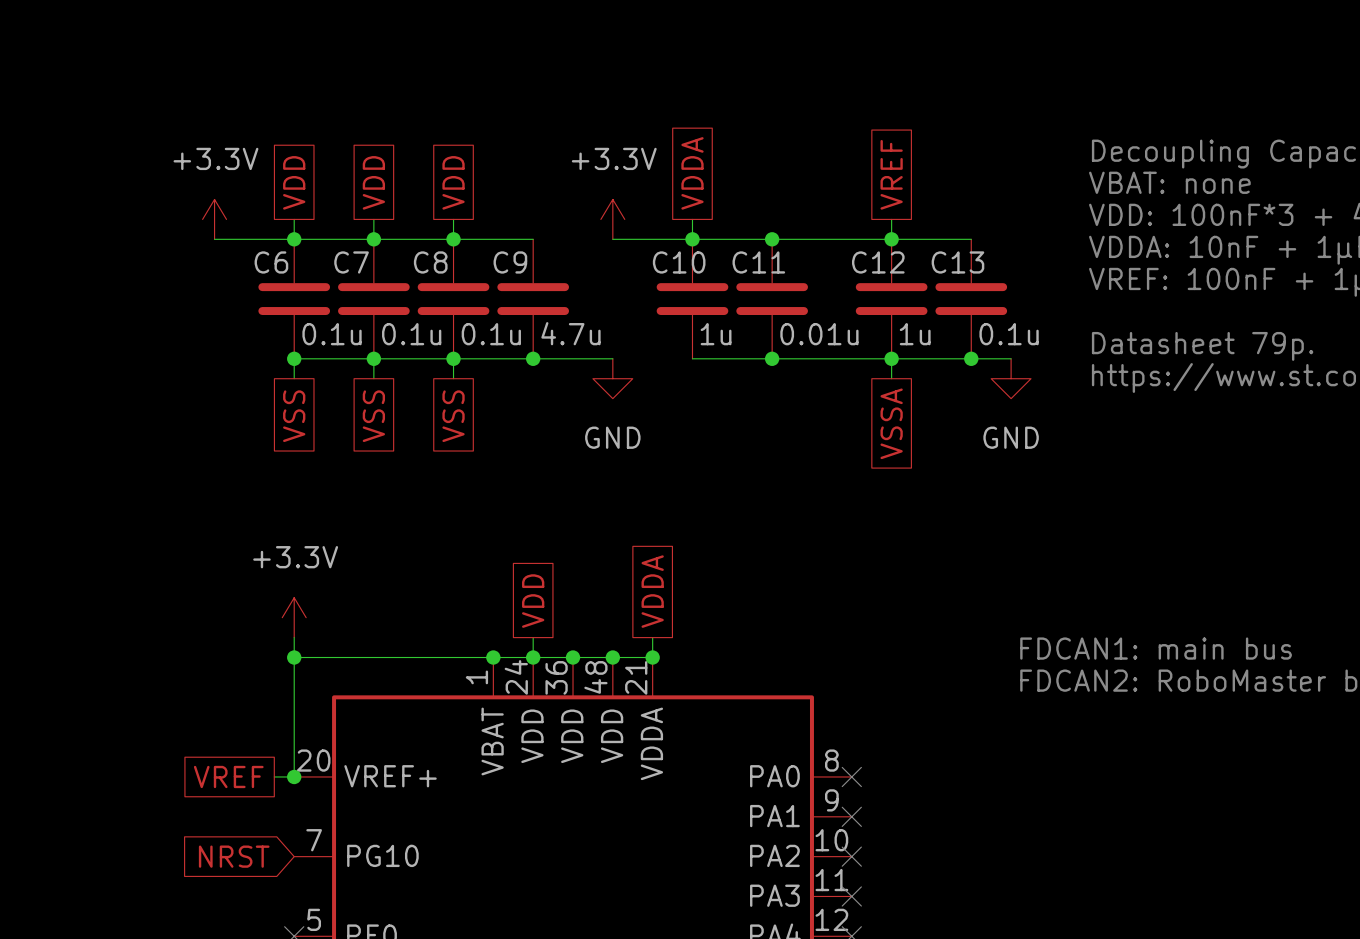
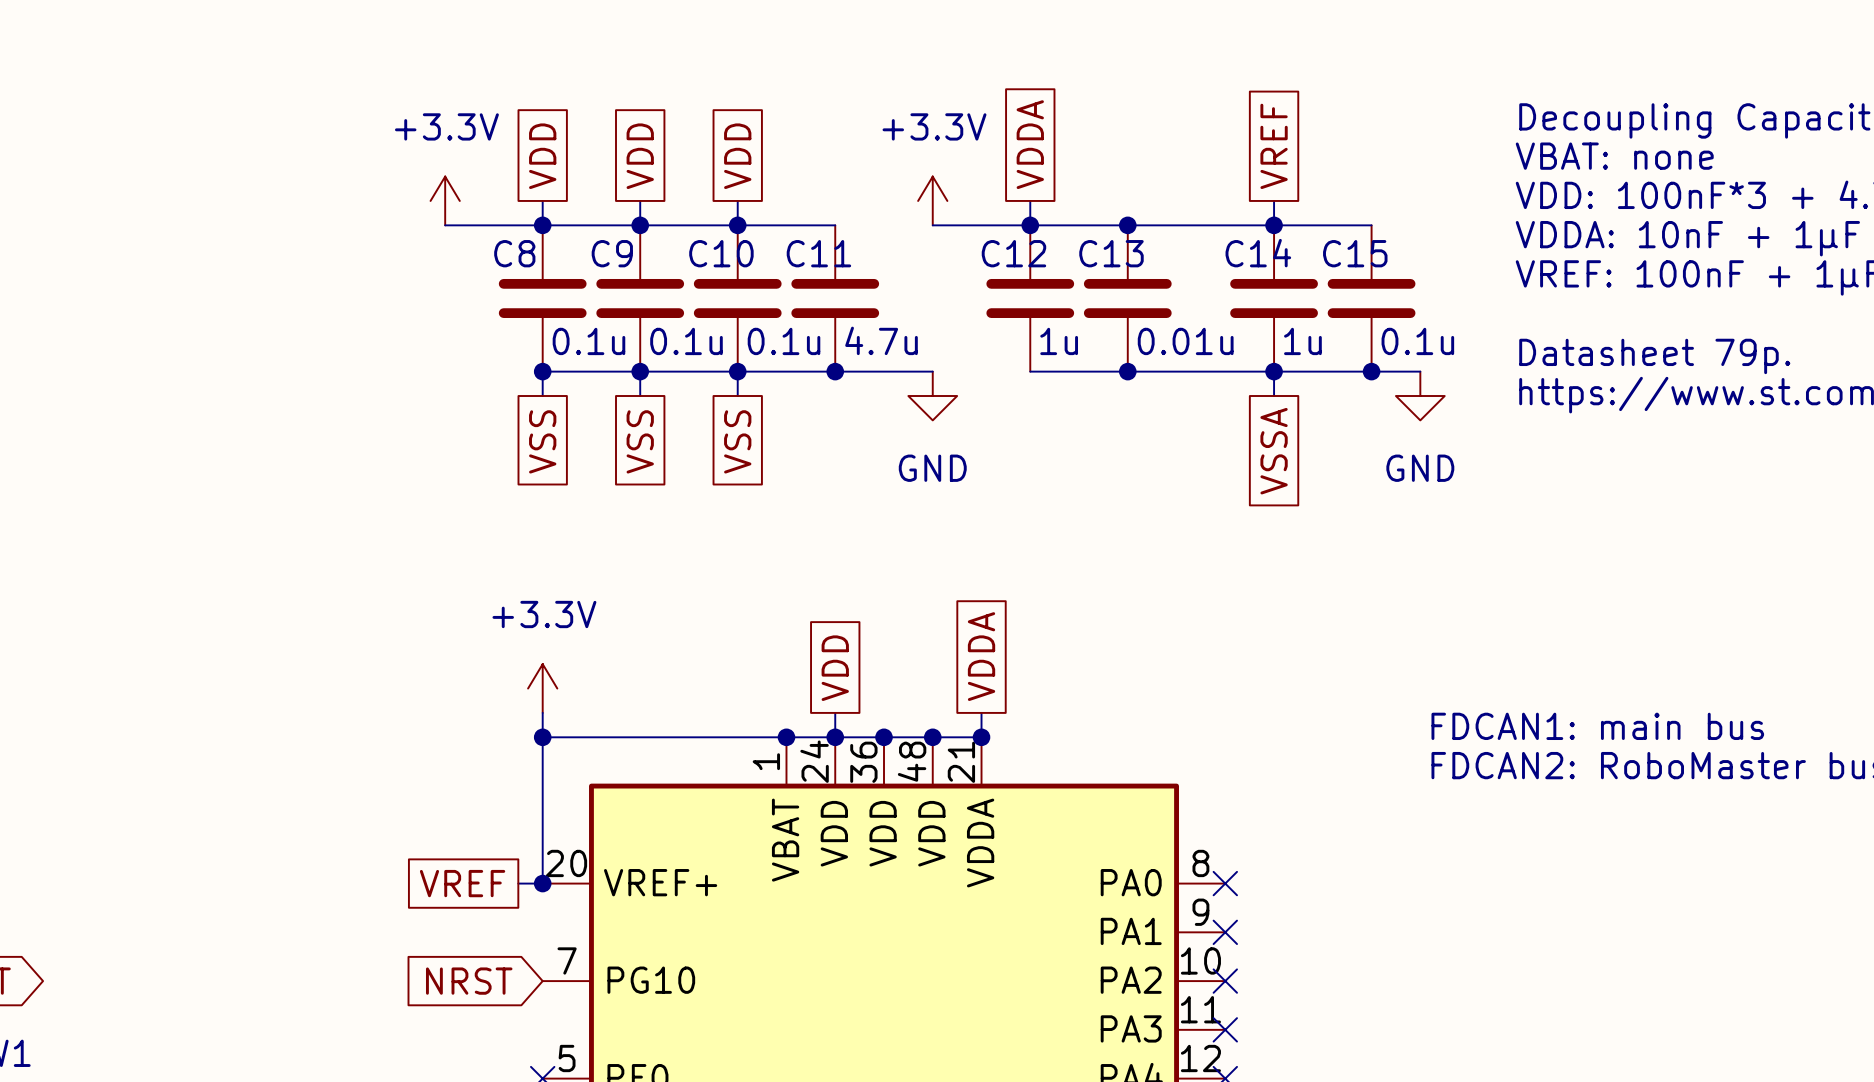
C6 name: C6 (271, 262) -> C8 (514, 253)
C7 name: C7 (351, 262) -> C9 (612, 253)
C8 name: C8 (430, 262) -> C10 (721, 253)
C9 name: C9 (510, 262) -> C11 (818, 253)
C10 name: C10 (679, 262) -> C12 (1013, 253)
C11 name: C11 (758, 262) -> C13 (1111, 253)
C12 name: C12 (878, 262) -> C14 (1258, 253)
C13 name: C13 (957, 262) -> C15 (1355, 253)

